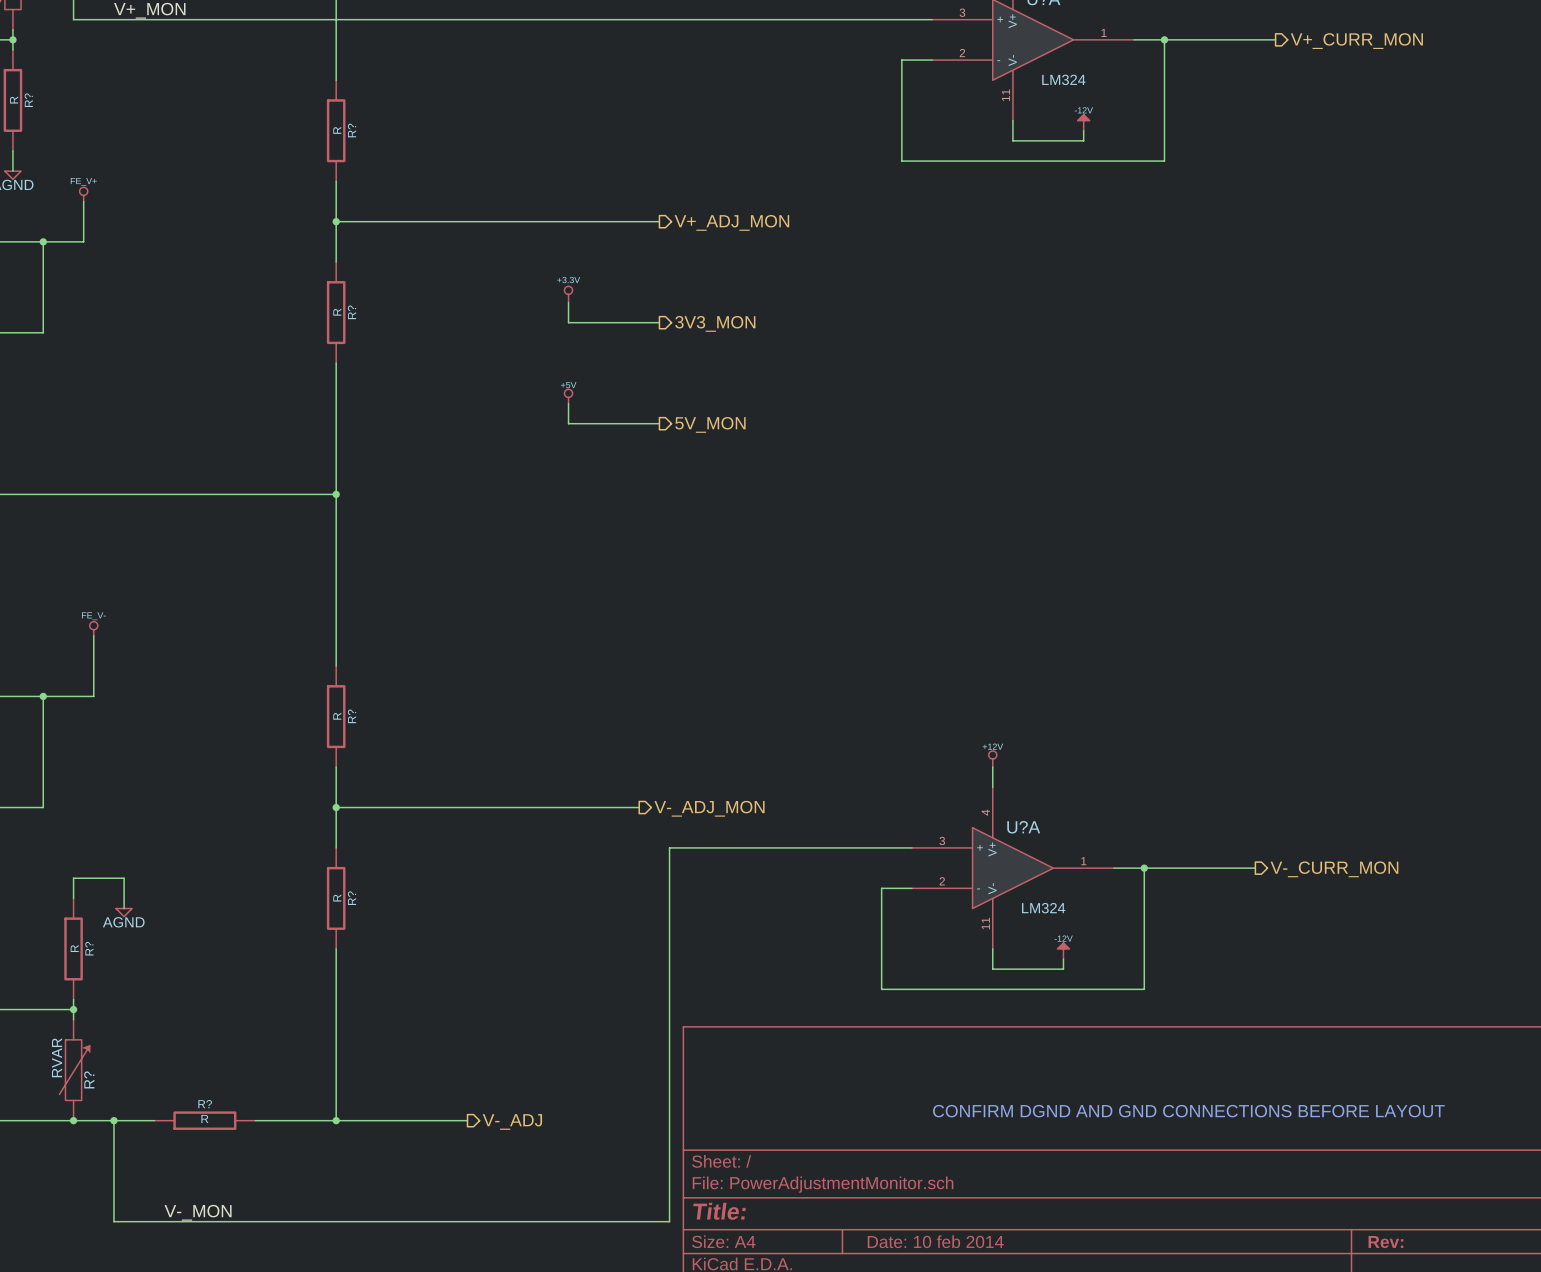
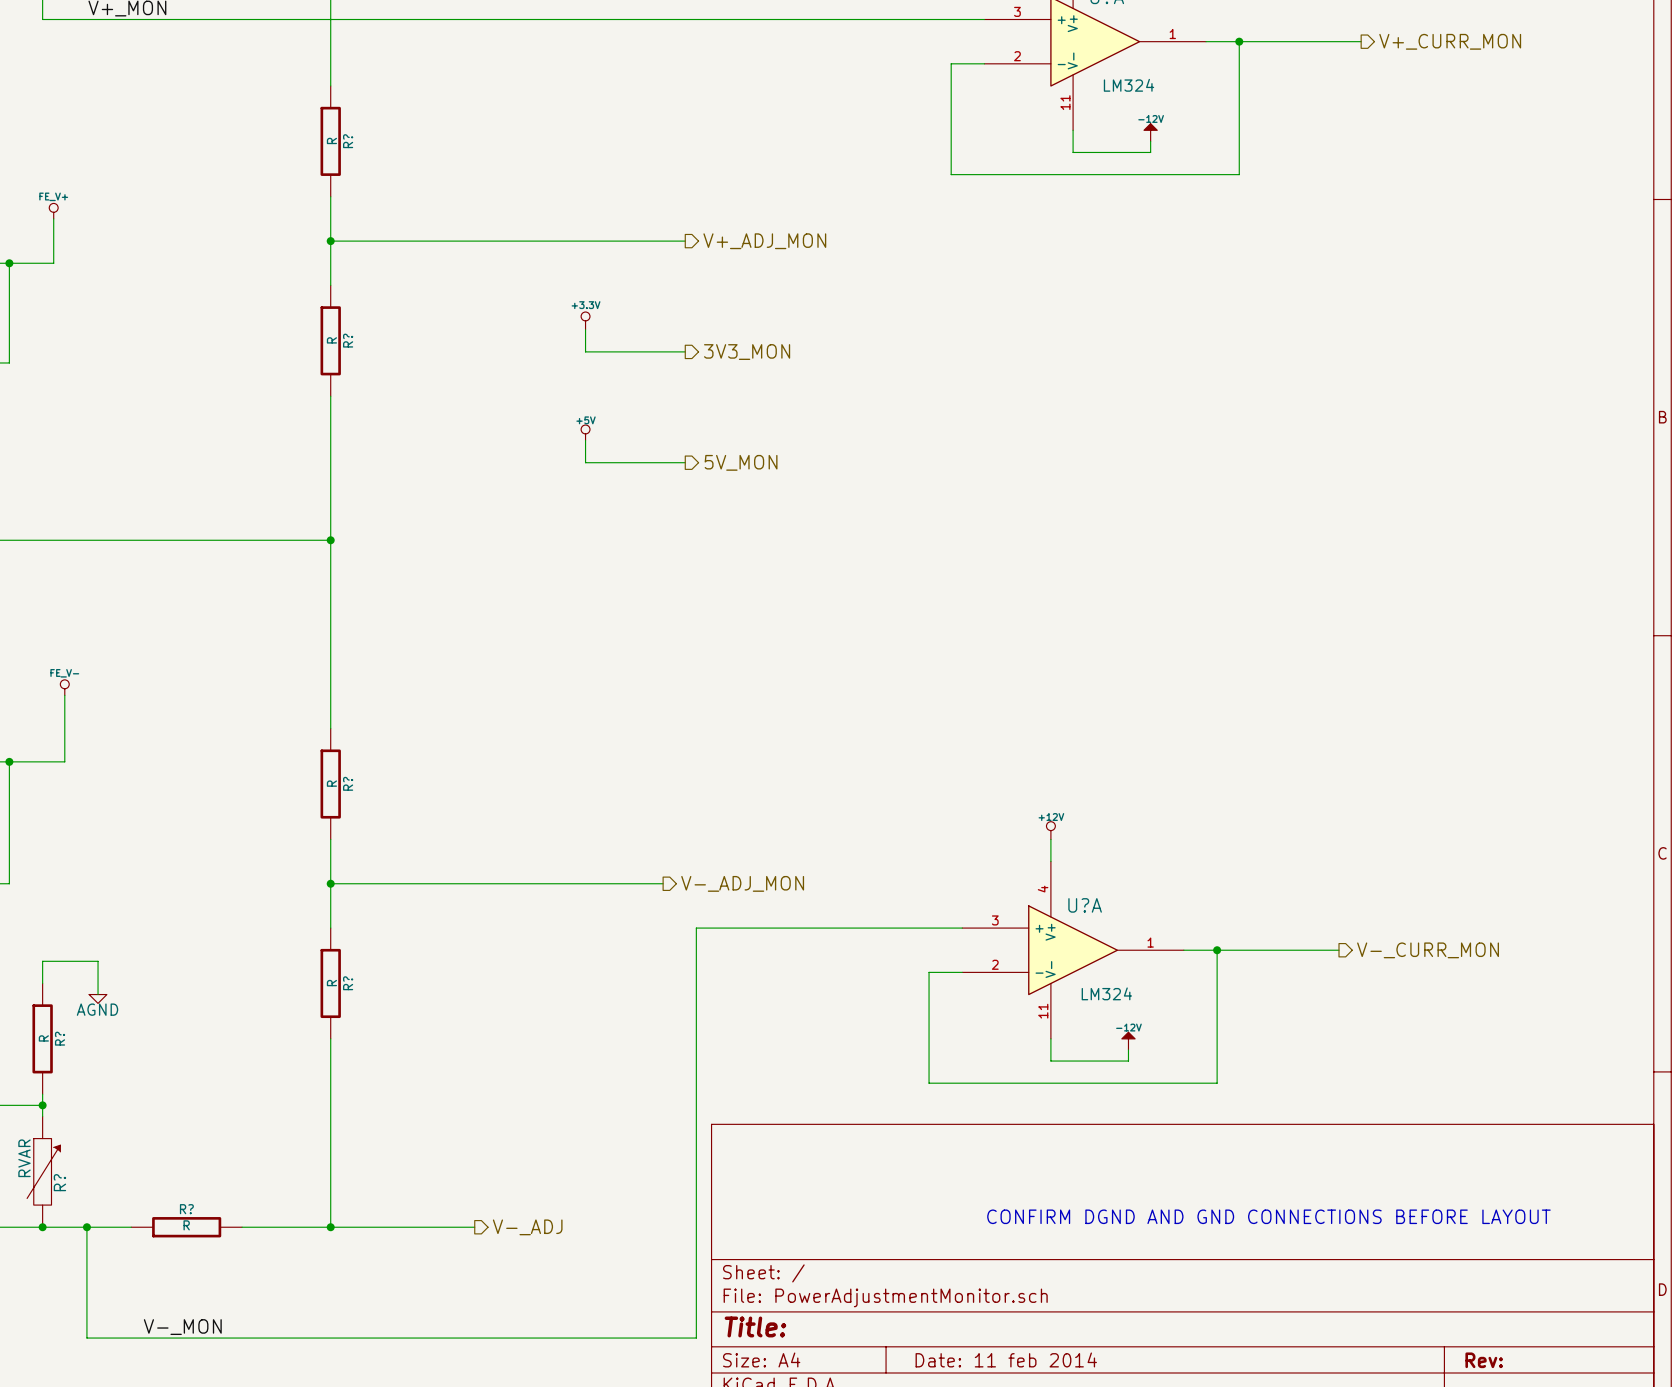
title block: Date: 10 feb 2014 (935, 1241) -> Date: 11 feb 2014 (1006, 1359)

